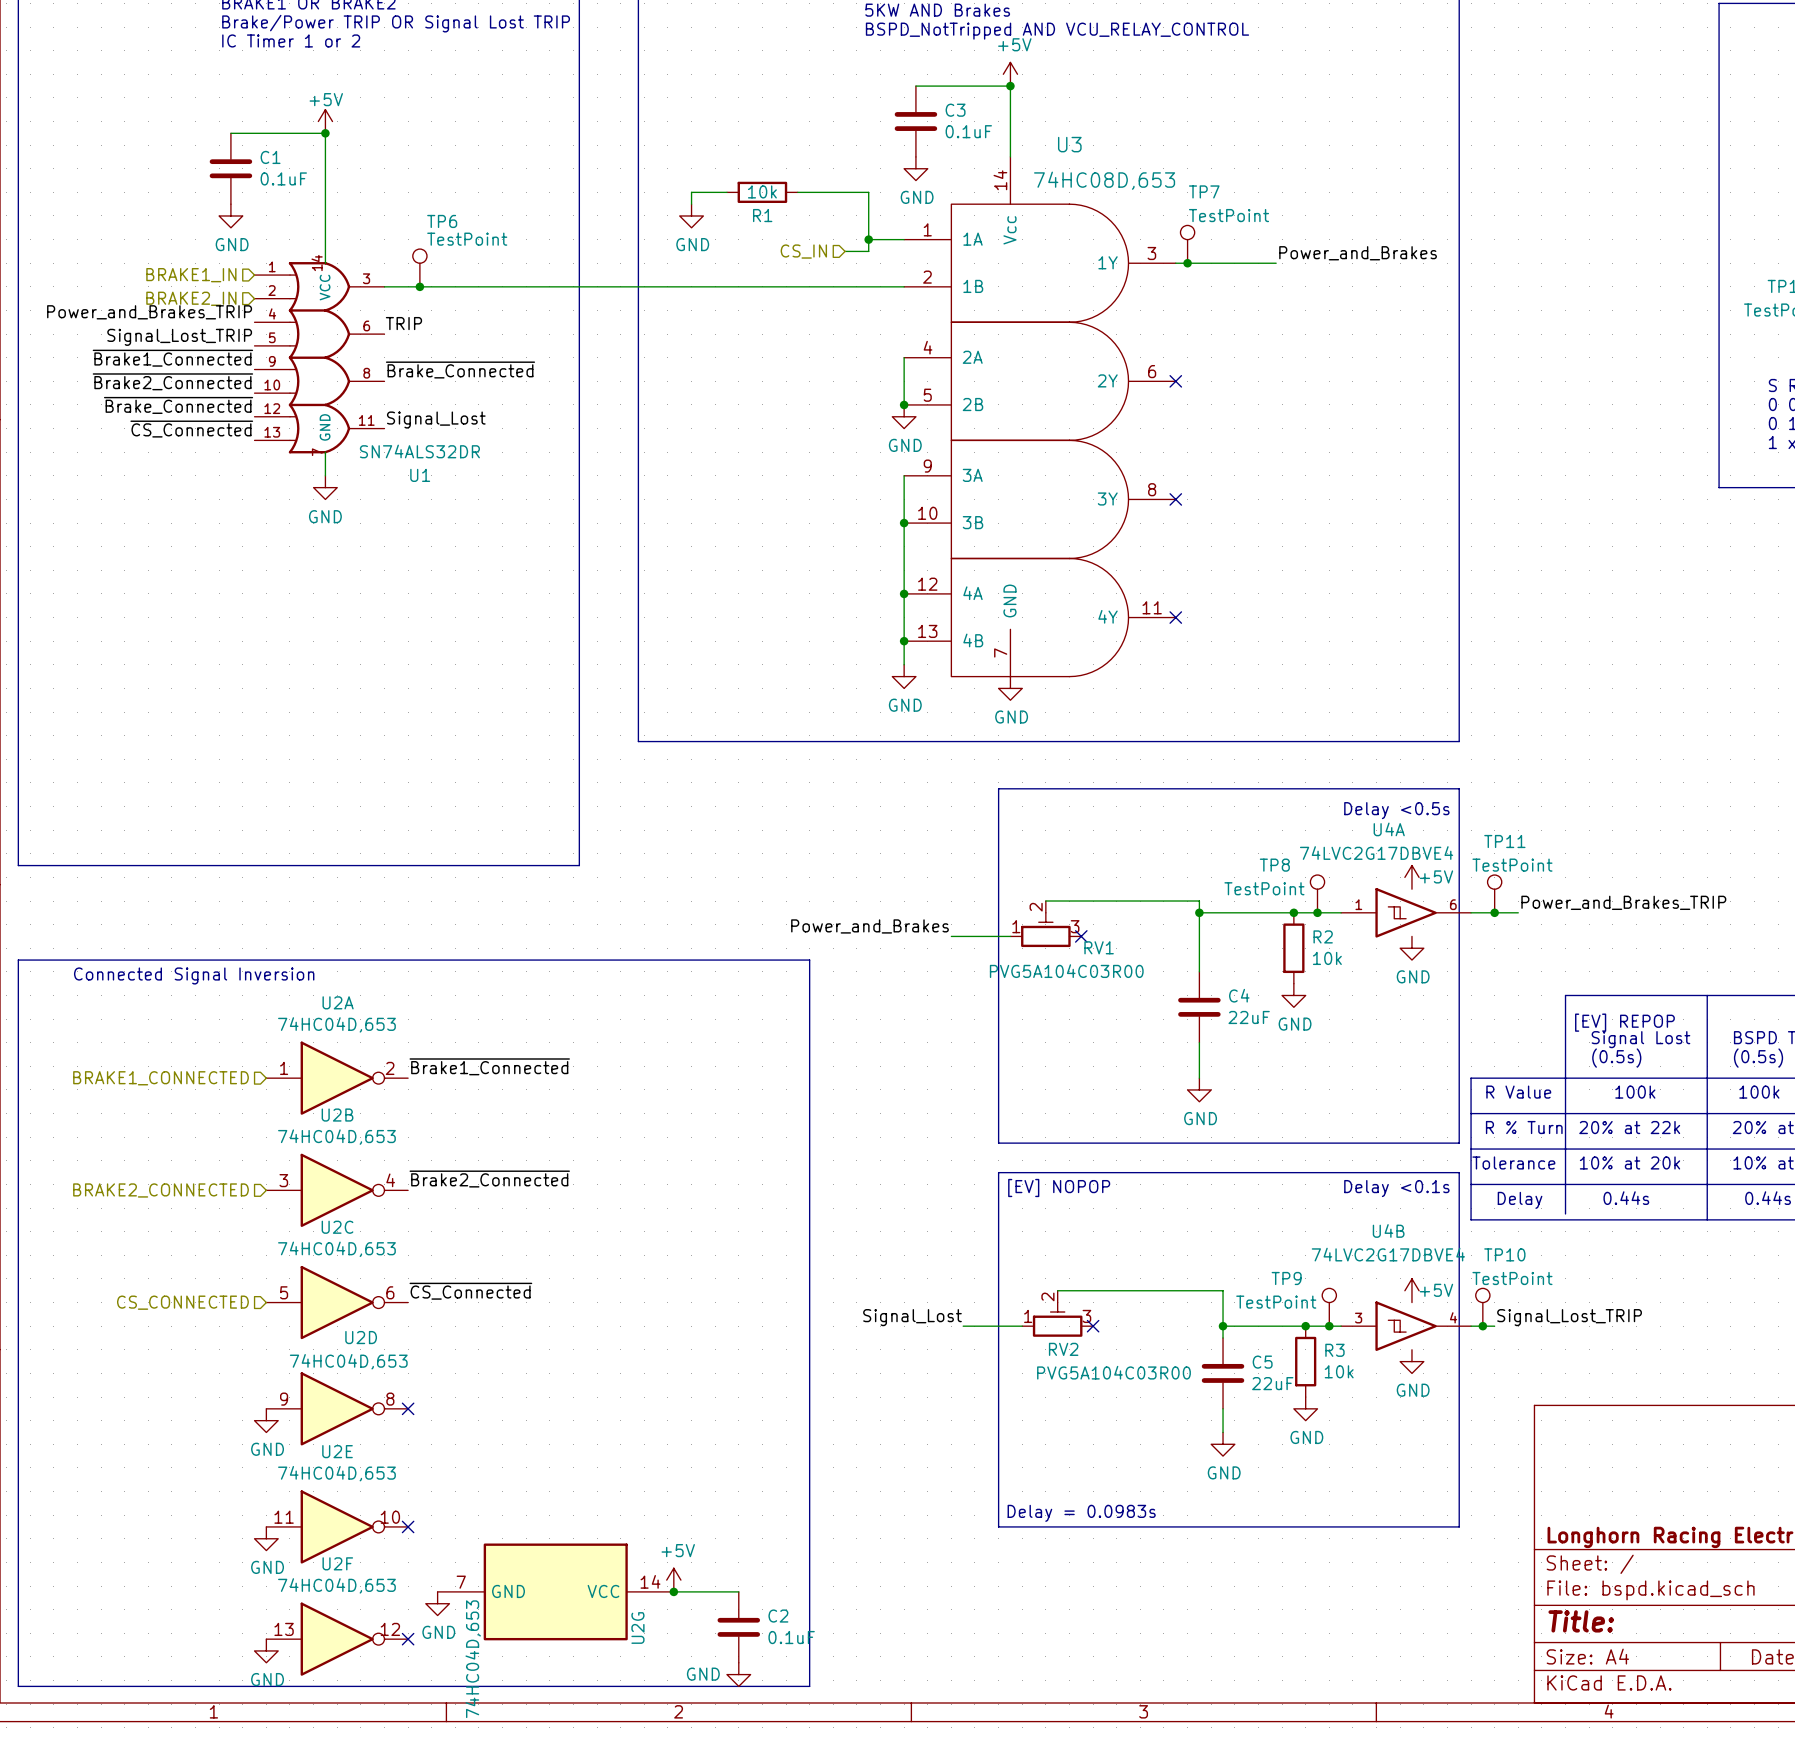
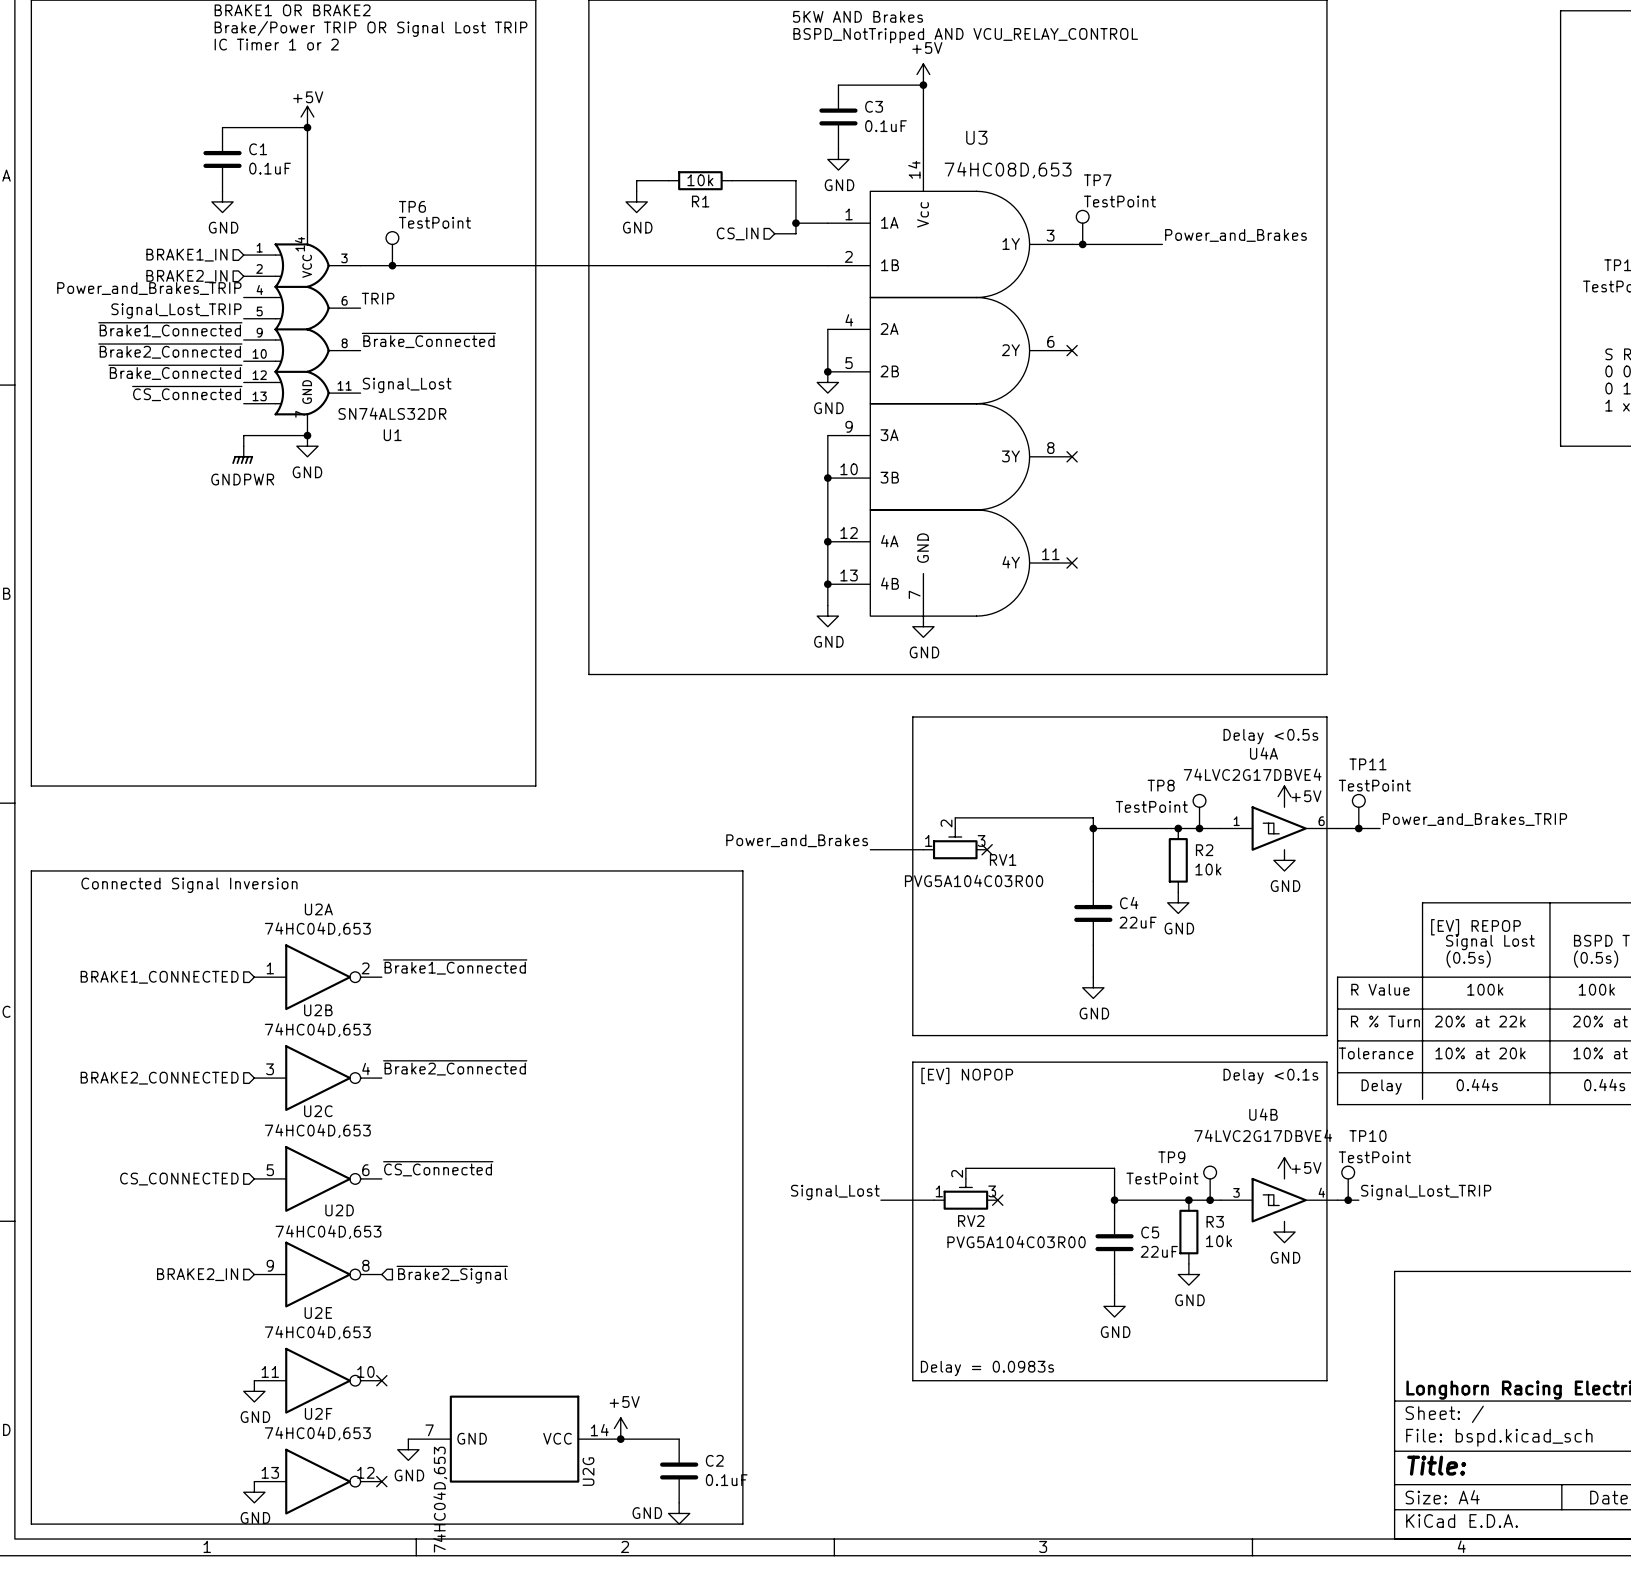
wire: none -> (307, 435) (243, 435) (243, 446)
junction: none -> (307, 435)
power symbol: none -> GNDPWR (242, 455)
hierarchical label: none -> BRAKE2_IN (197, 1274)
no-connect mark: (408, 1408) -> none
hierarchical label: none -> ~{Brake2_Signal} (452, 1274)
power symbol: GND (266, 1420) -> none

